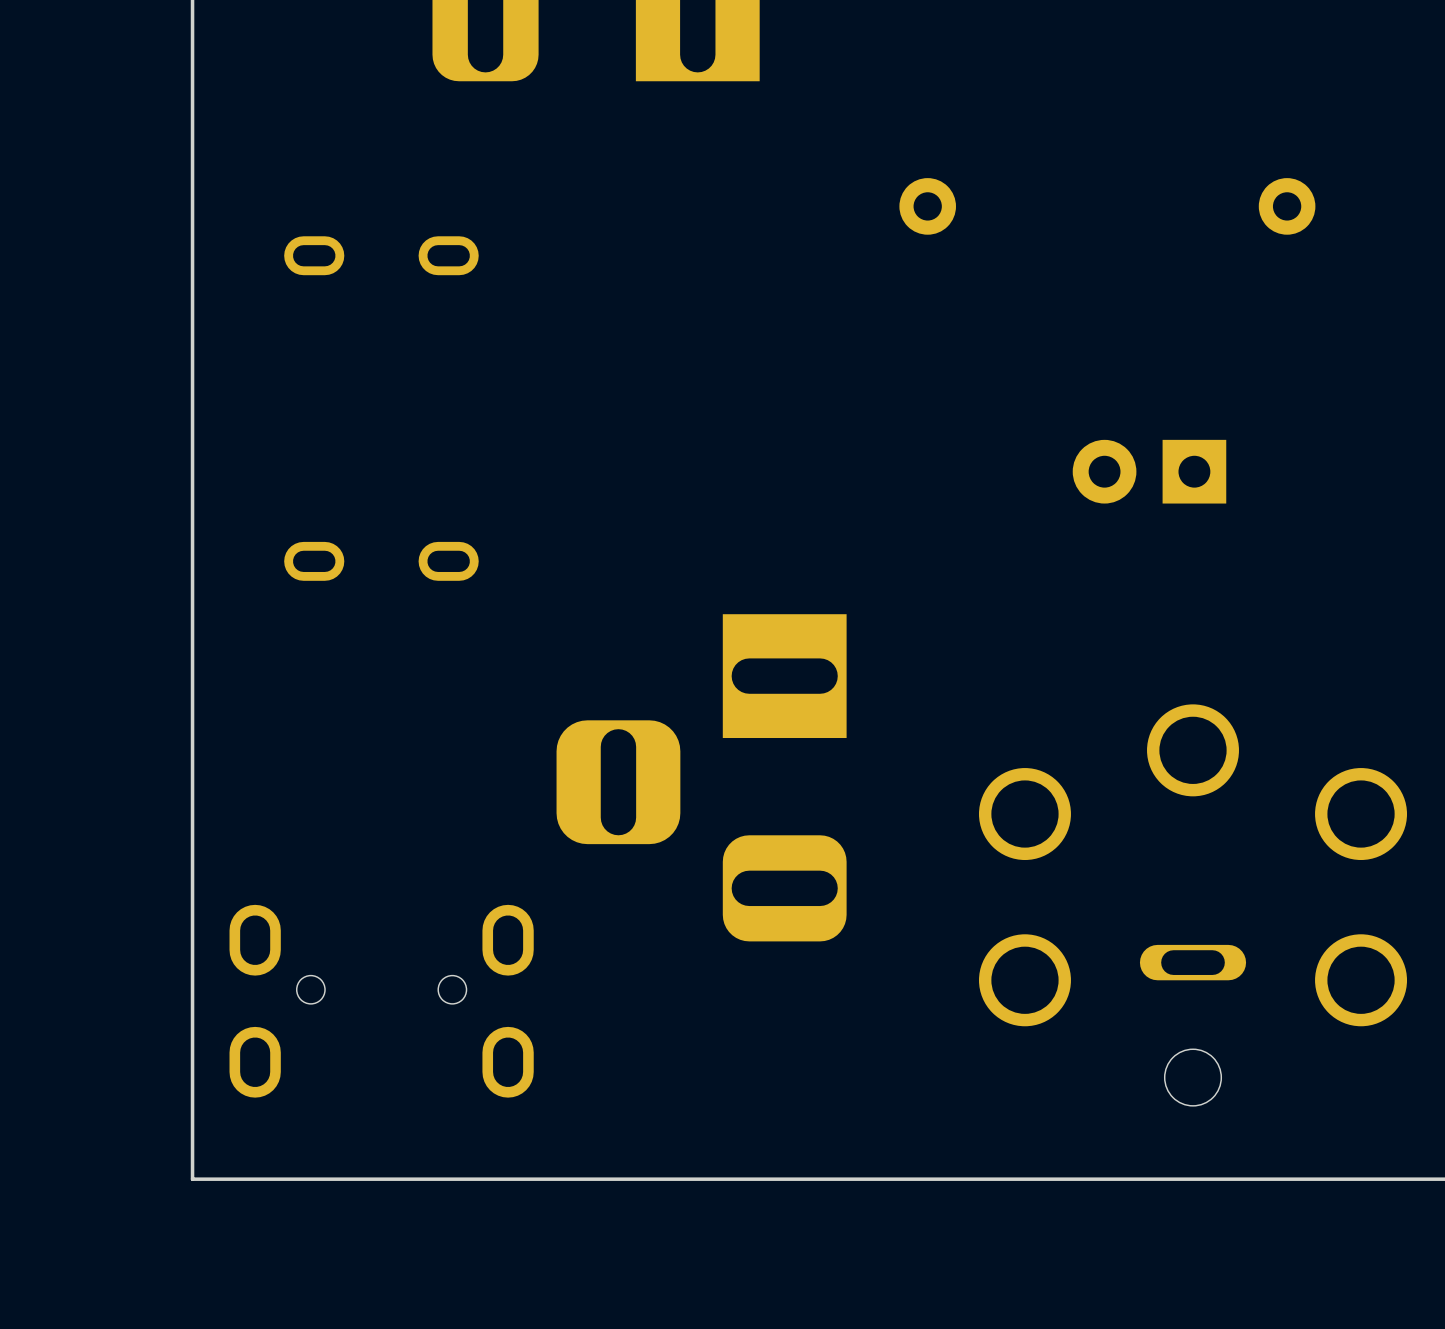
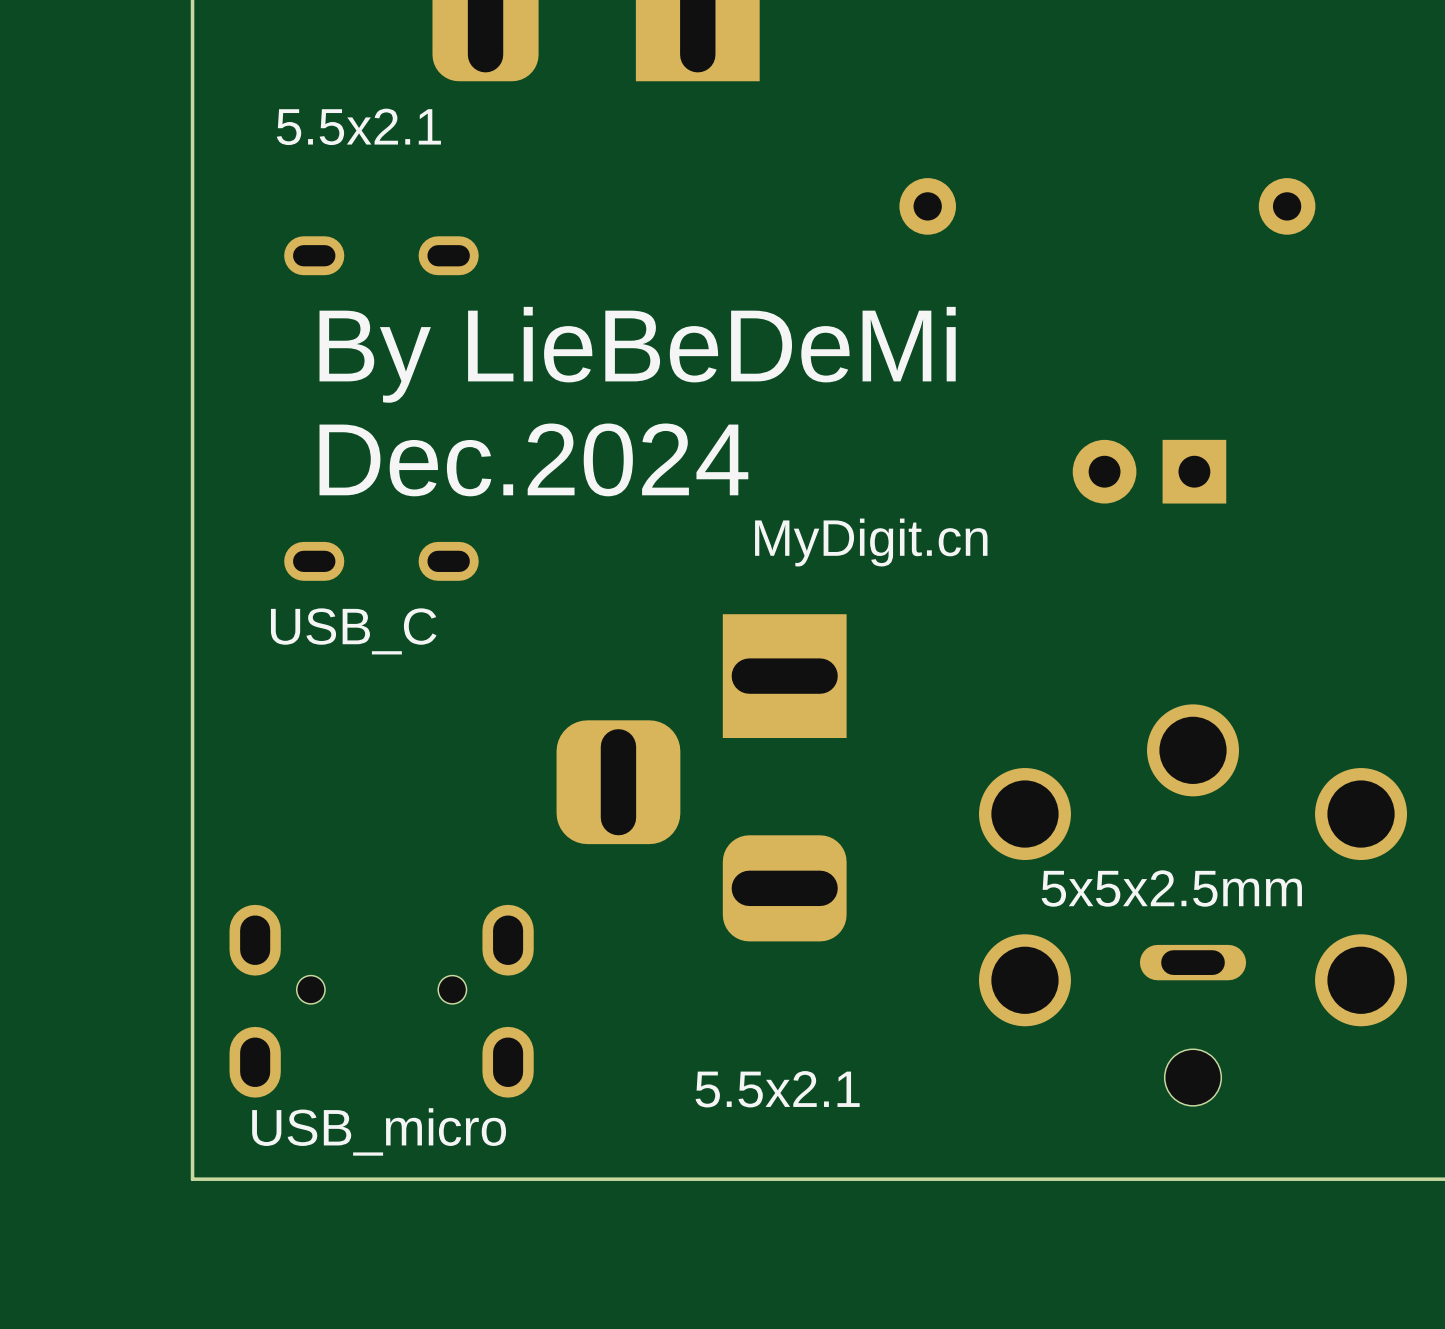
text: none -> 5.5x2.1 (358, 126)
text: none -> By LieBeDeMi (637, 354)
text: none -> Dec.2024 (533, 459)
text: none -> MyDigit.cn (871, 542)
text: none -> USB_C (353, 631)
text: none -> 5x5x2.5mm (1171, 888)
text: none -> 5.5x2.1 (777, 1089)
text: none -> USB_micro (379, 1131)

